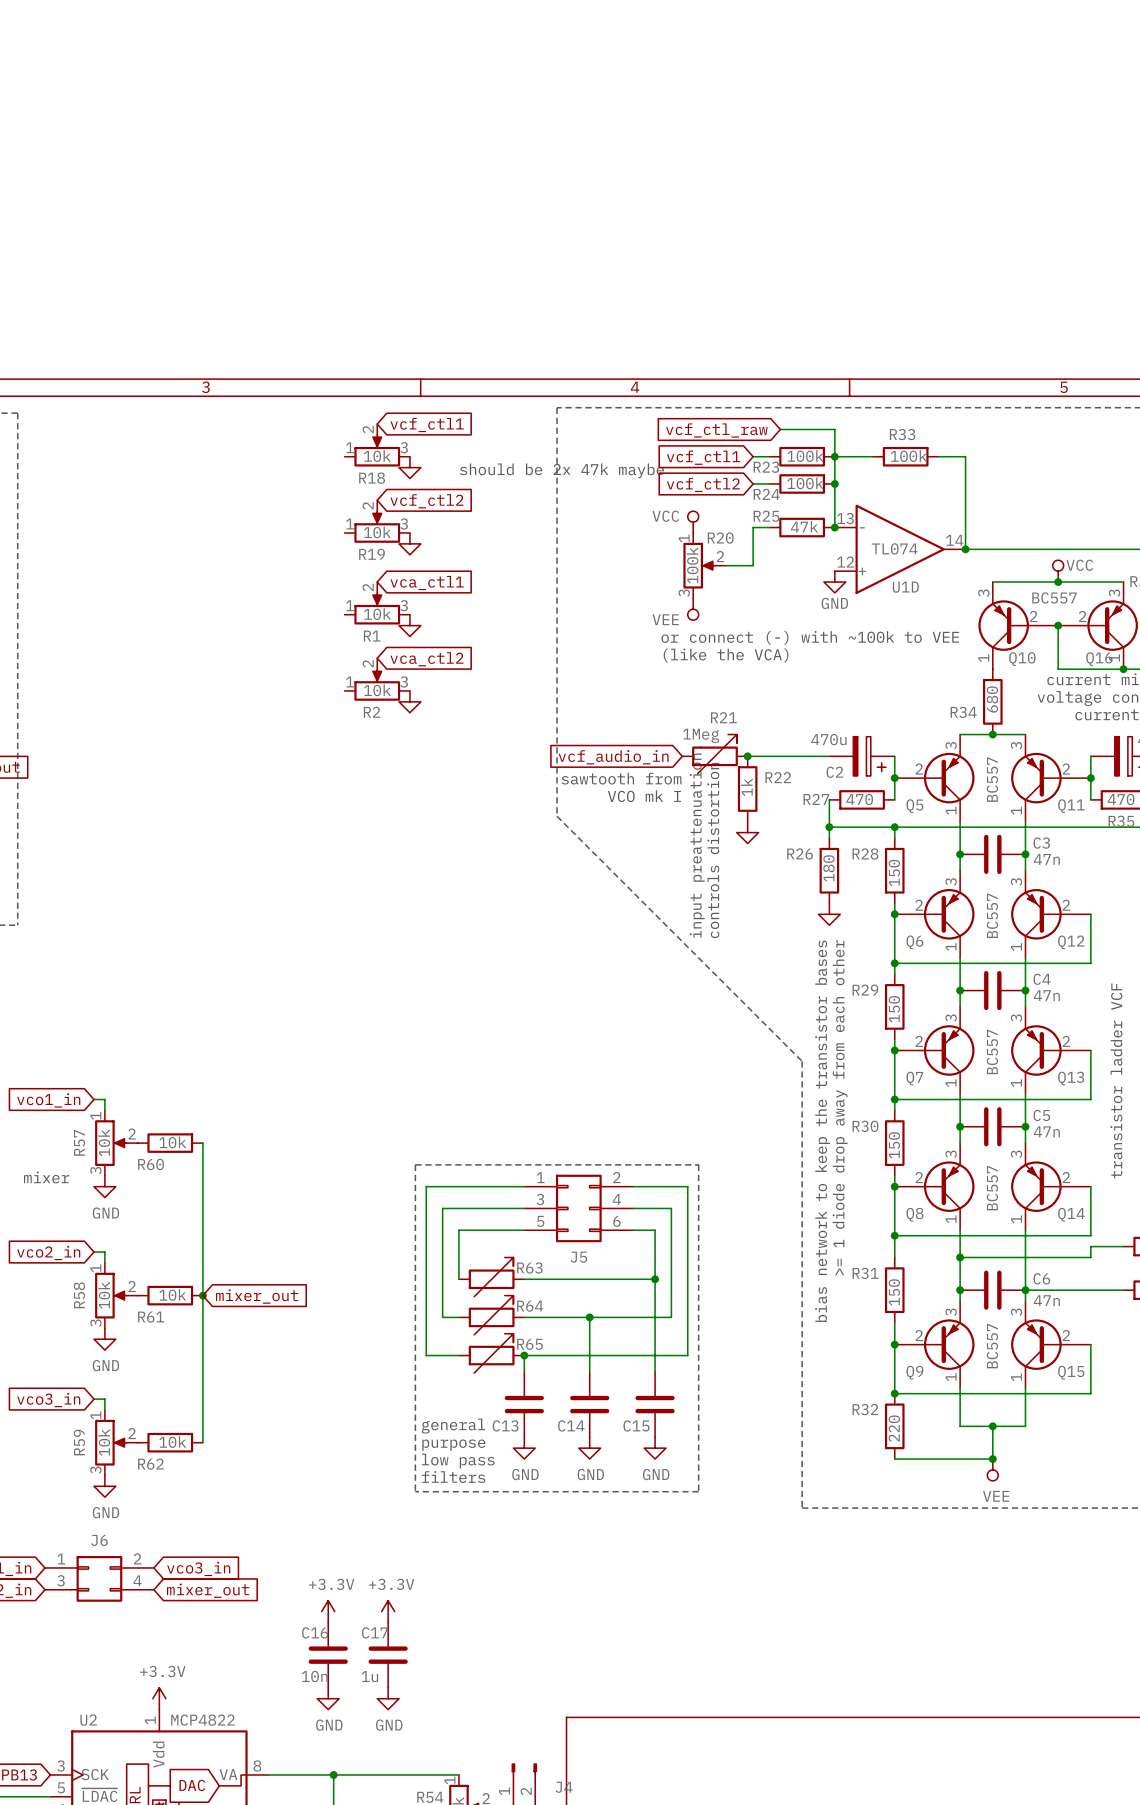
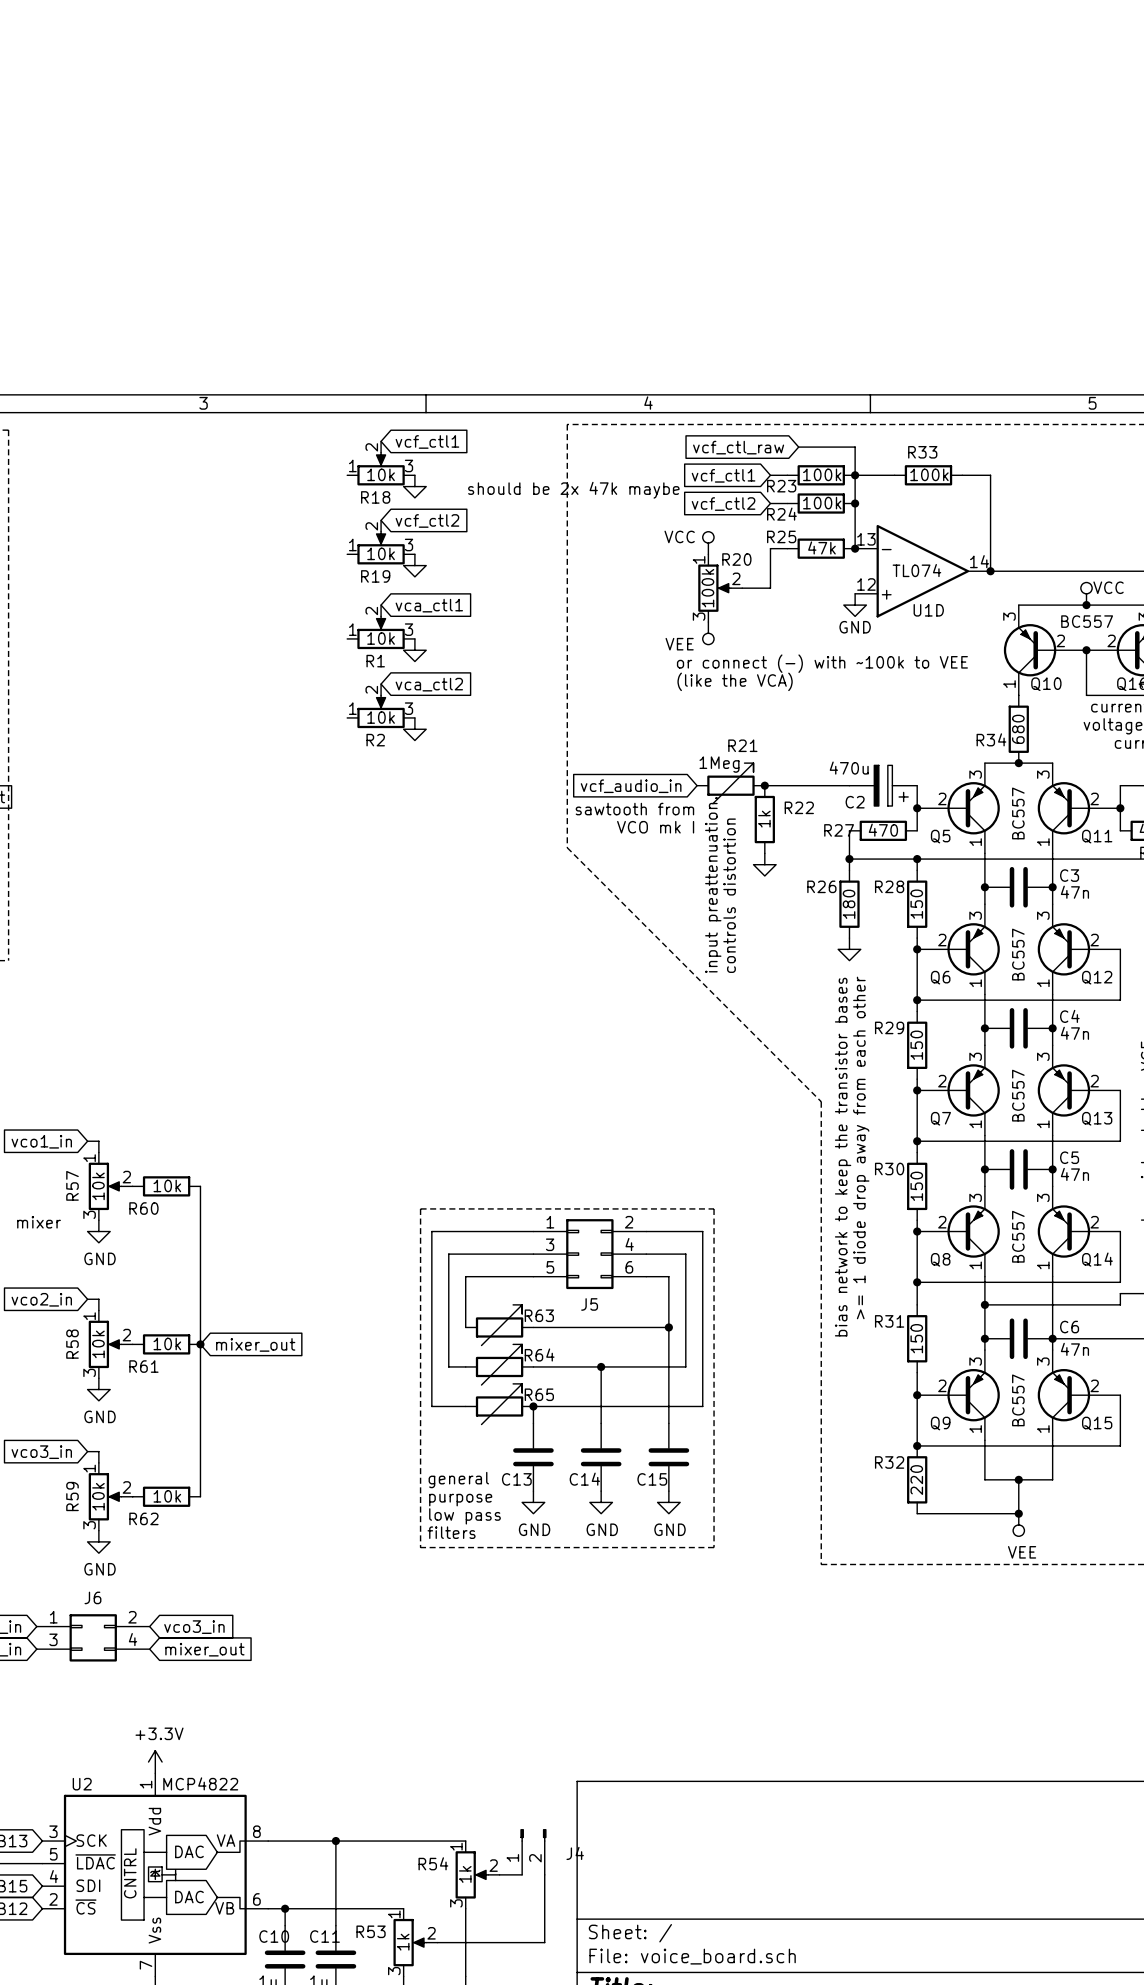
power symbol: +3.3V (328, 1611) -> none
power symbol: +3.3V (388, 1611) -> none
C16: 10n (328, 1655) -> none
C17: 1u (388, 1655) -> none
power symbol: GND (328, 1698) -> none
power symbol: GND (388, 1698) -> none

